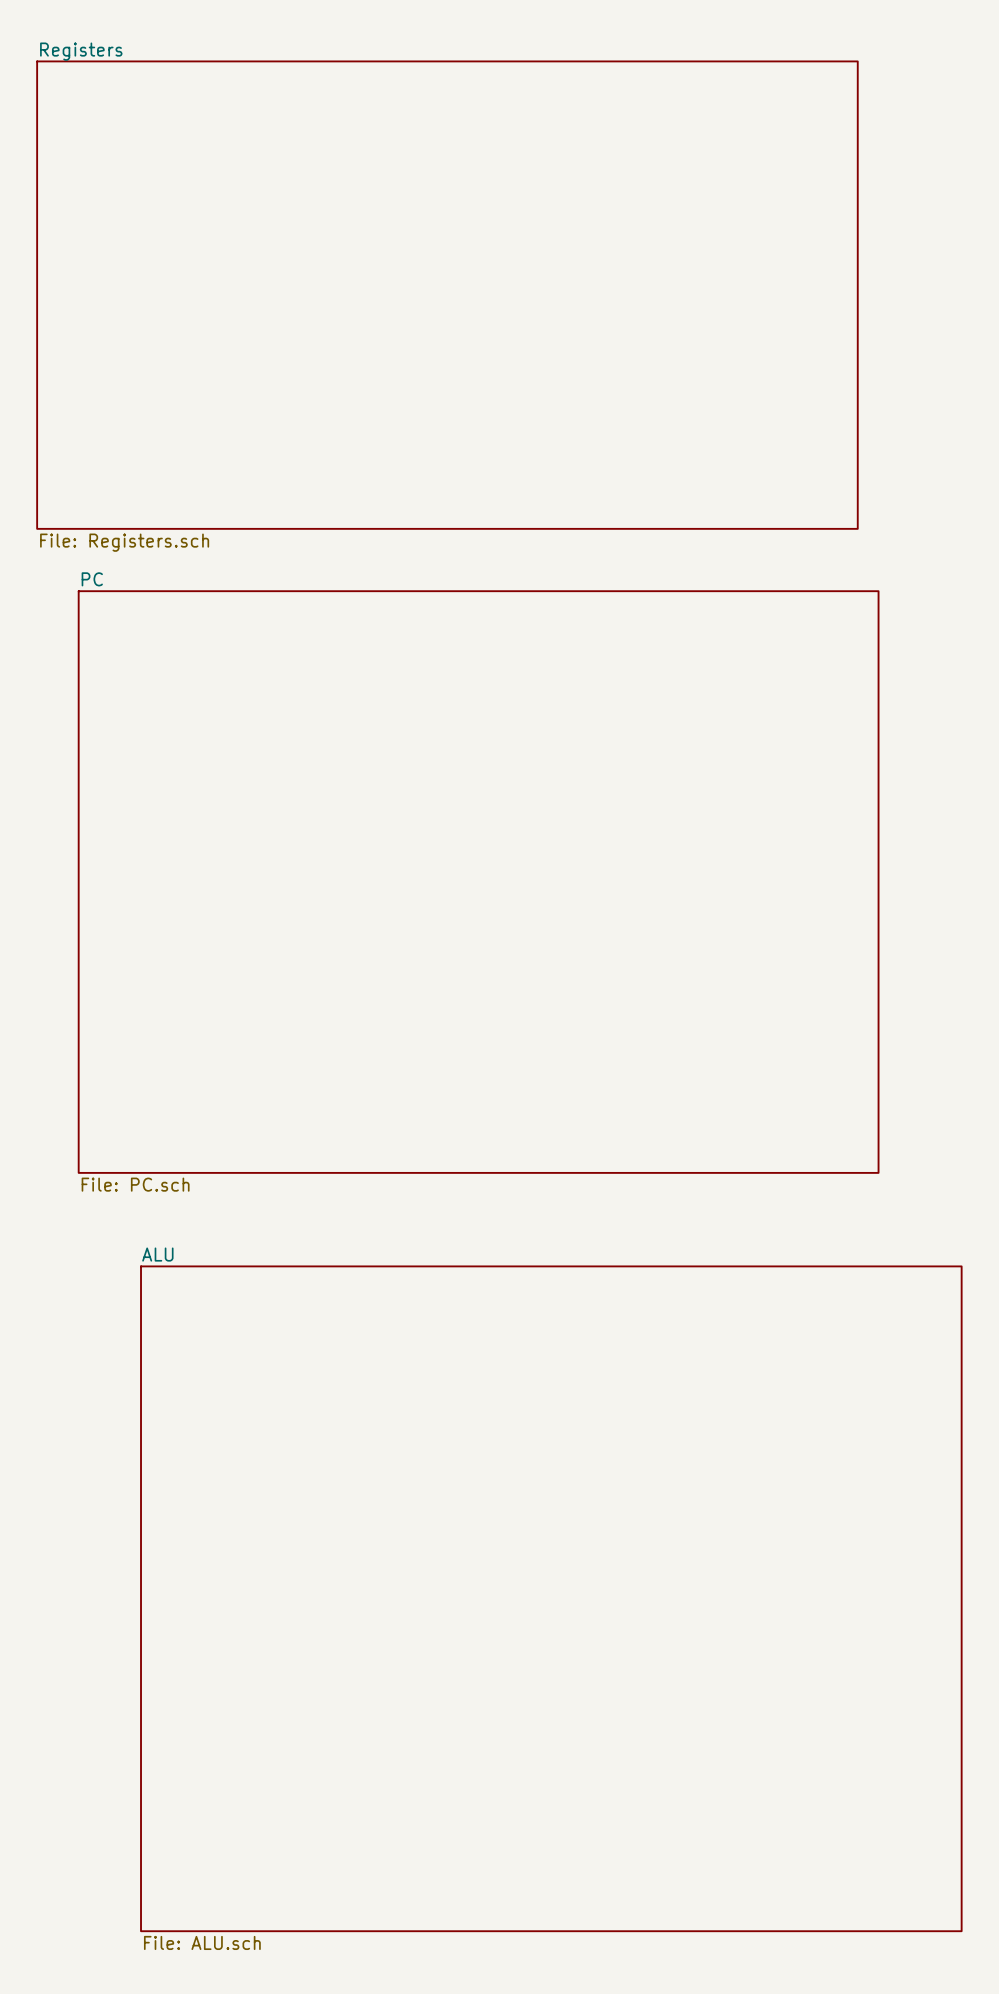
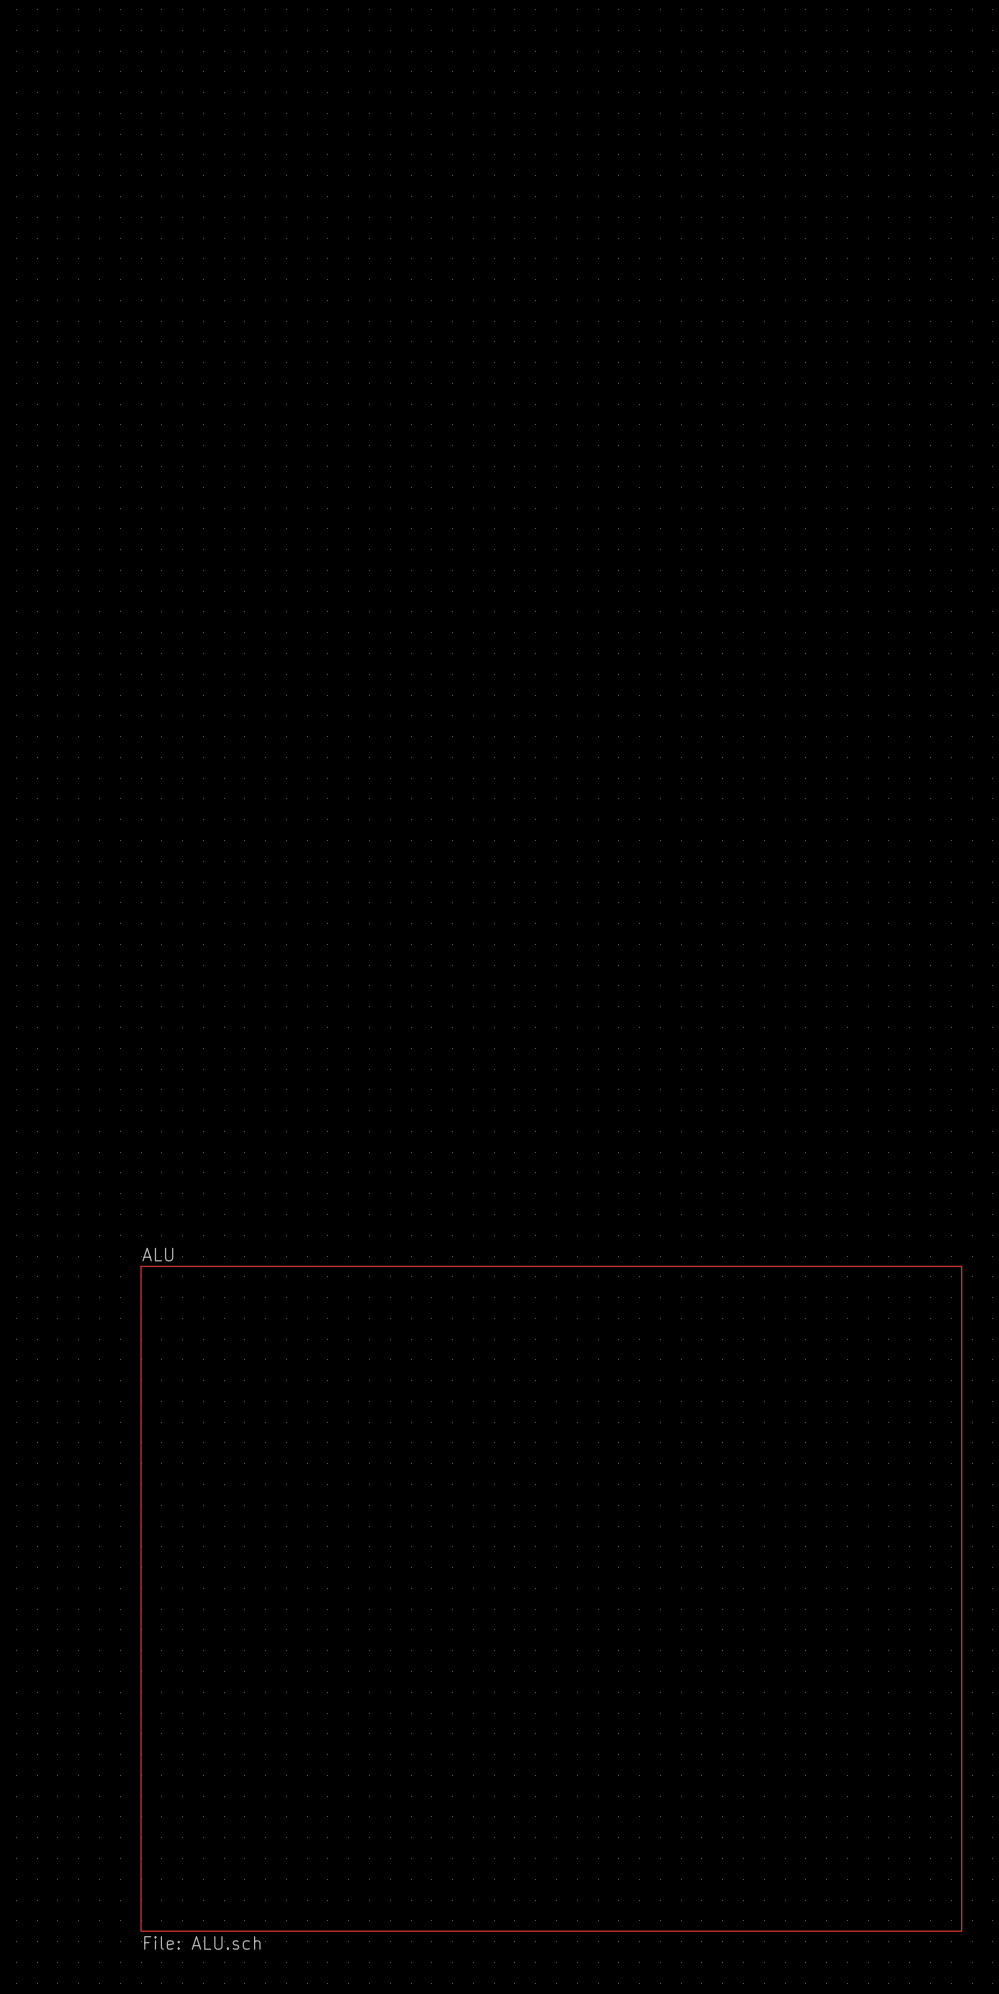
sheet Registers: File: Registers.sch (447, 295) -> none
sheet PC: File: PC.sch (478, 882) -> none

